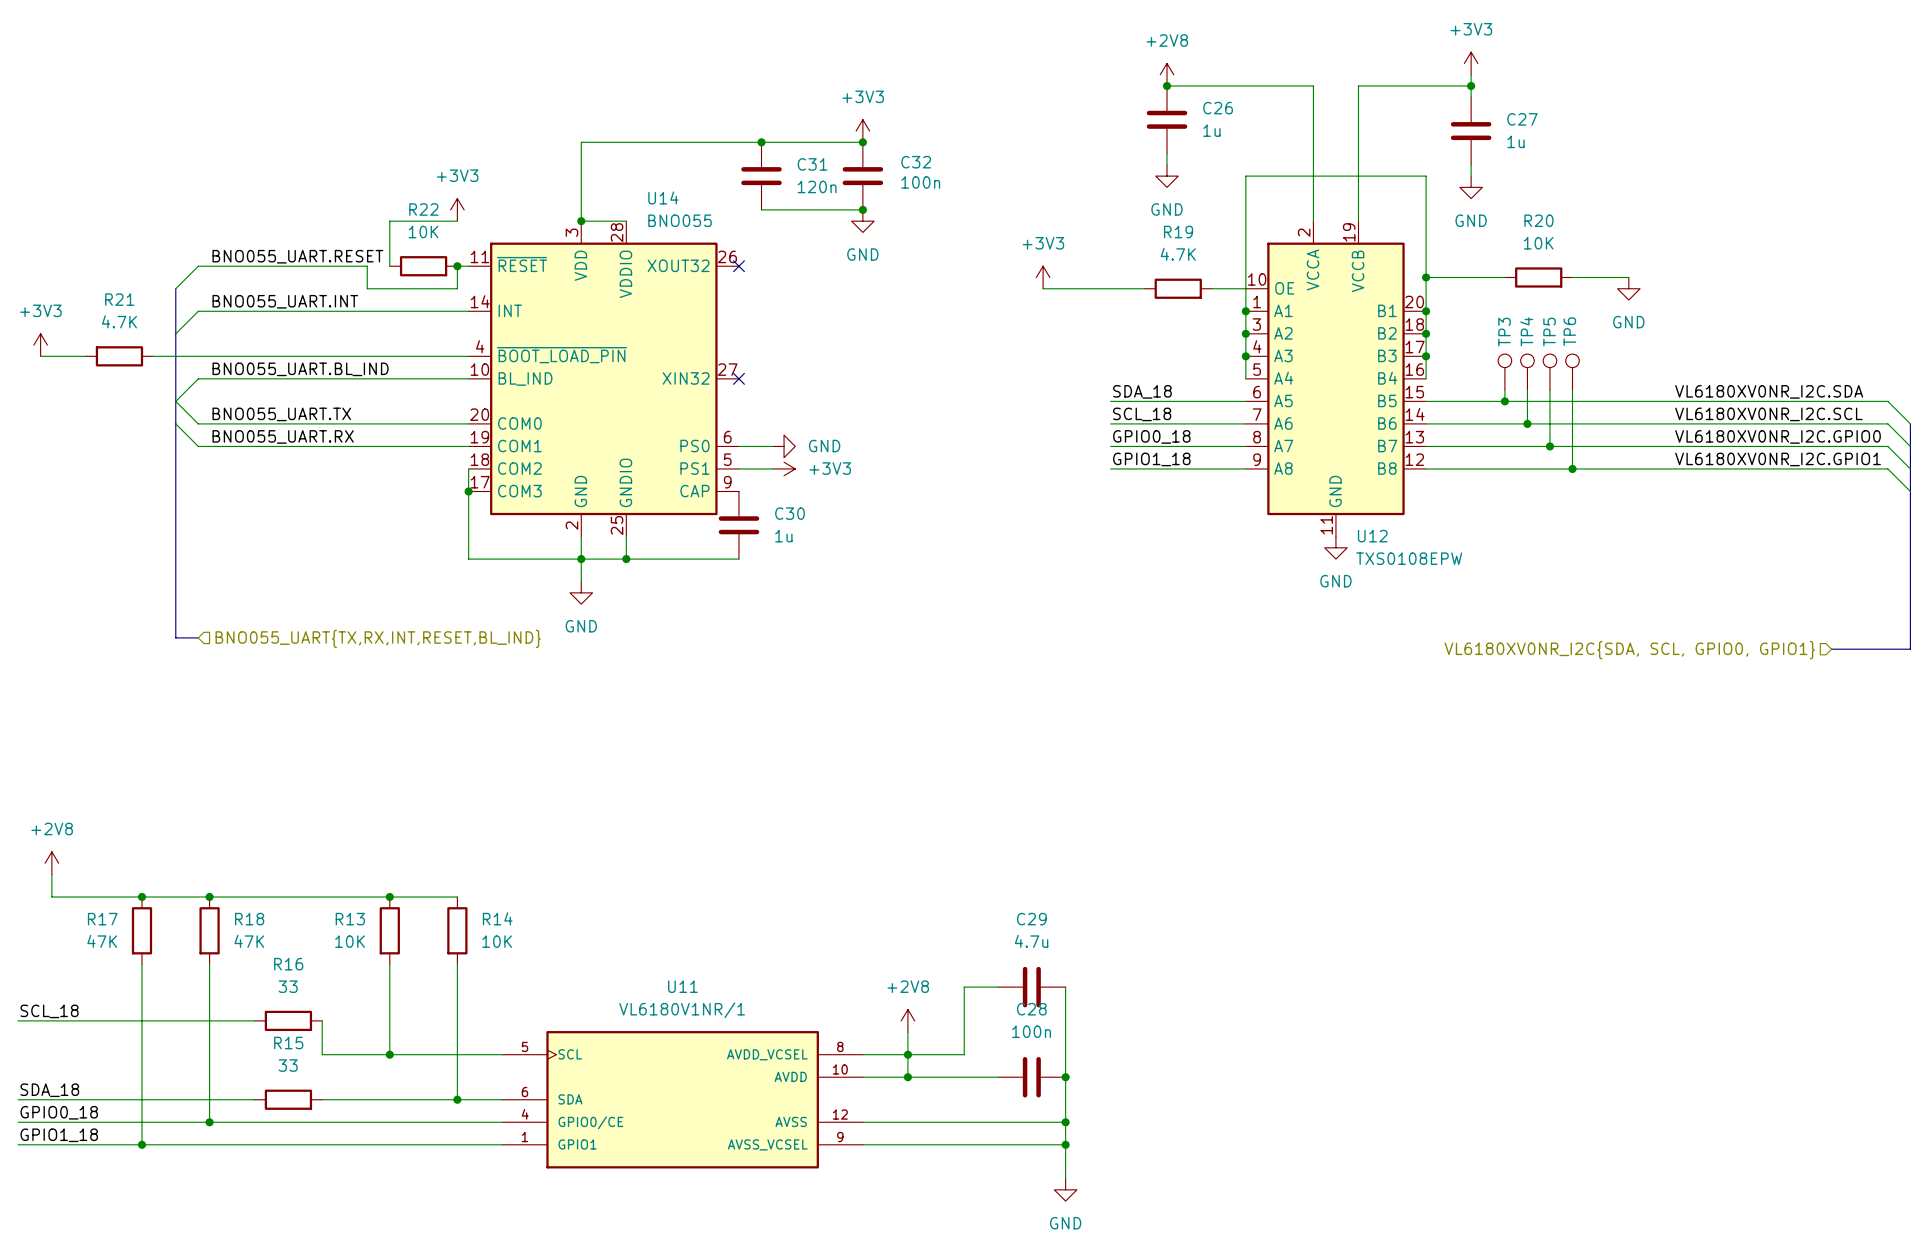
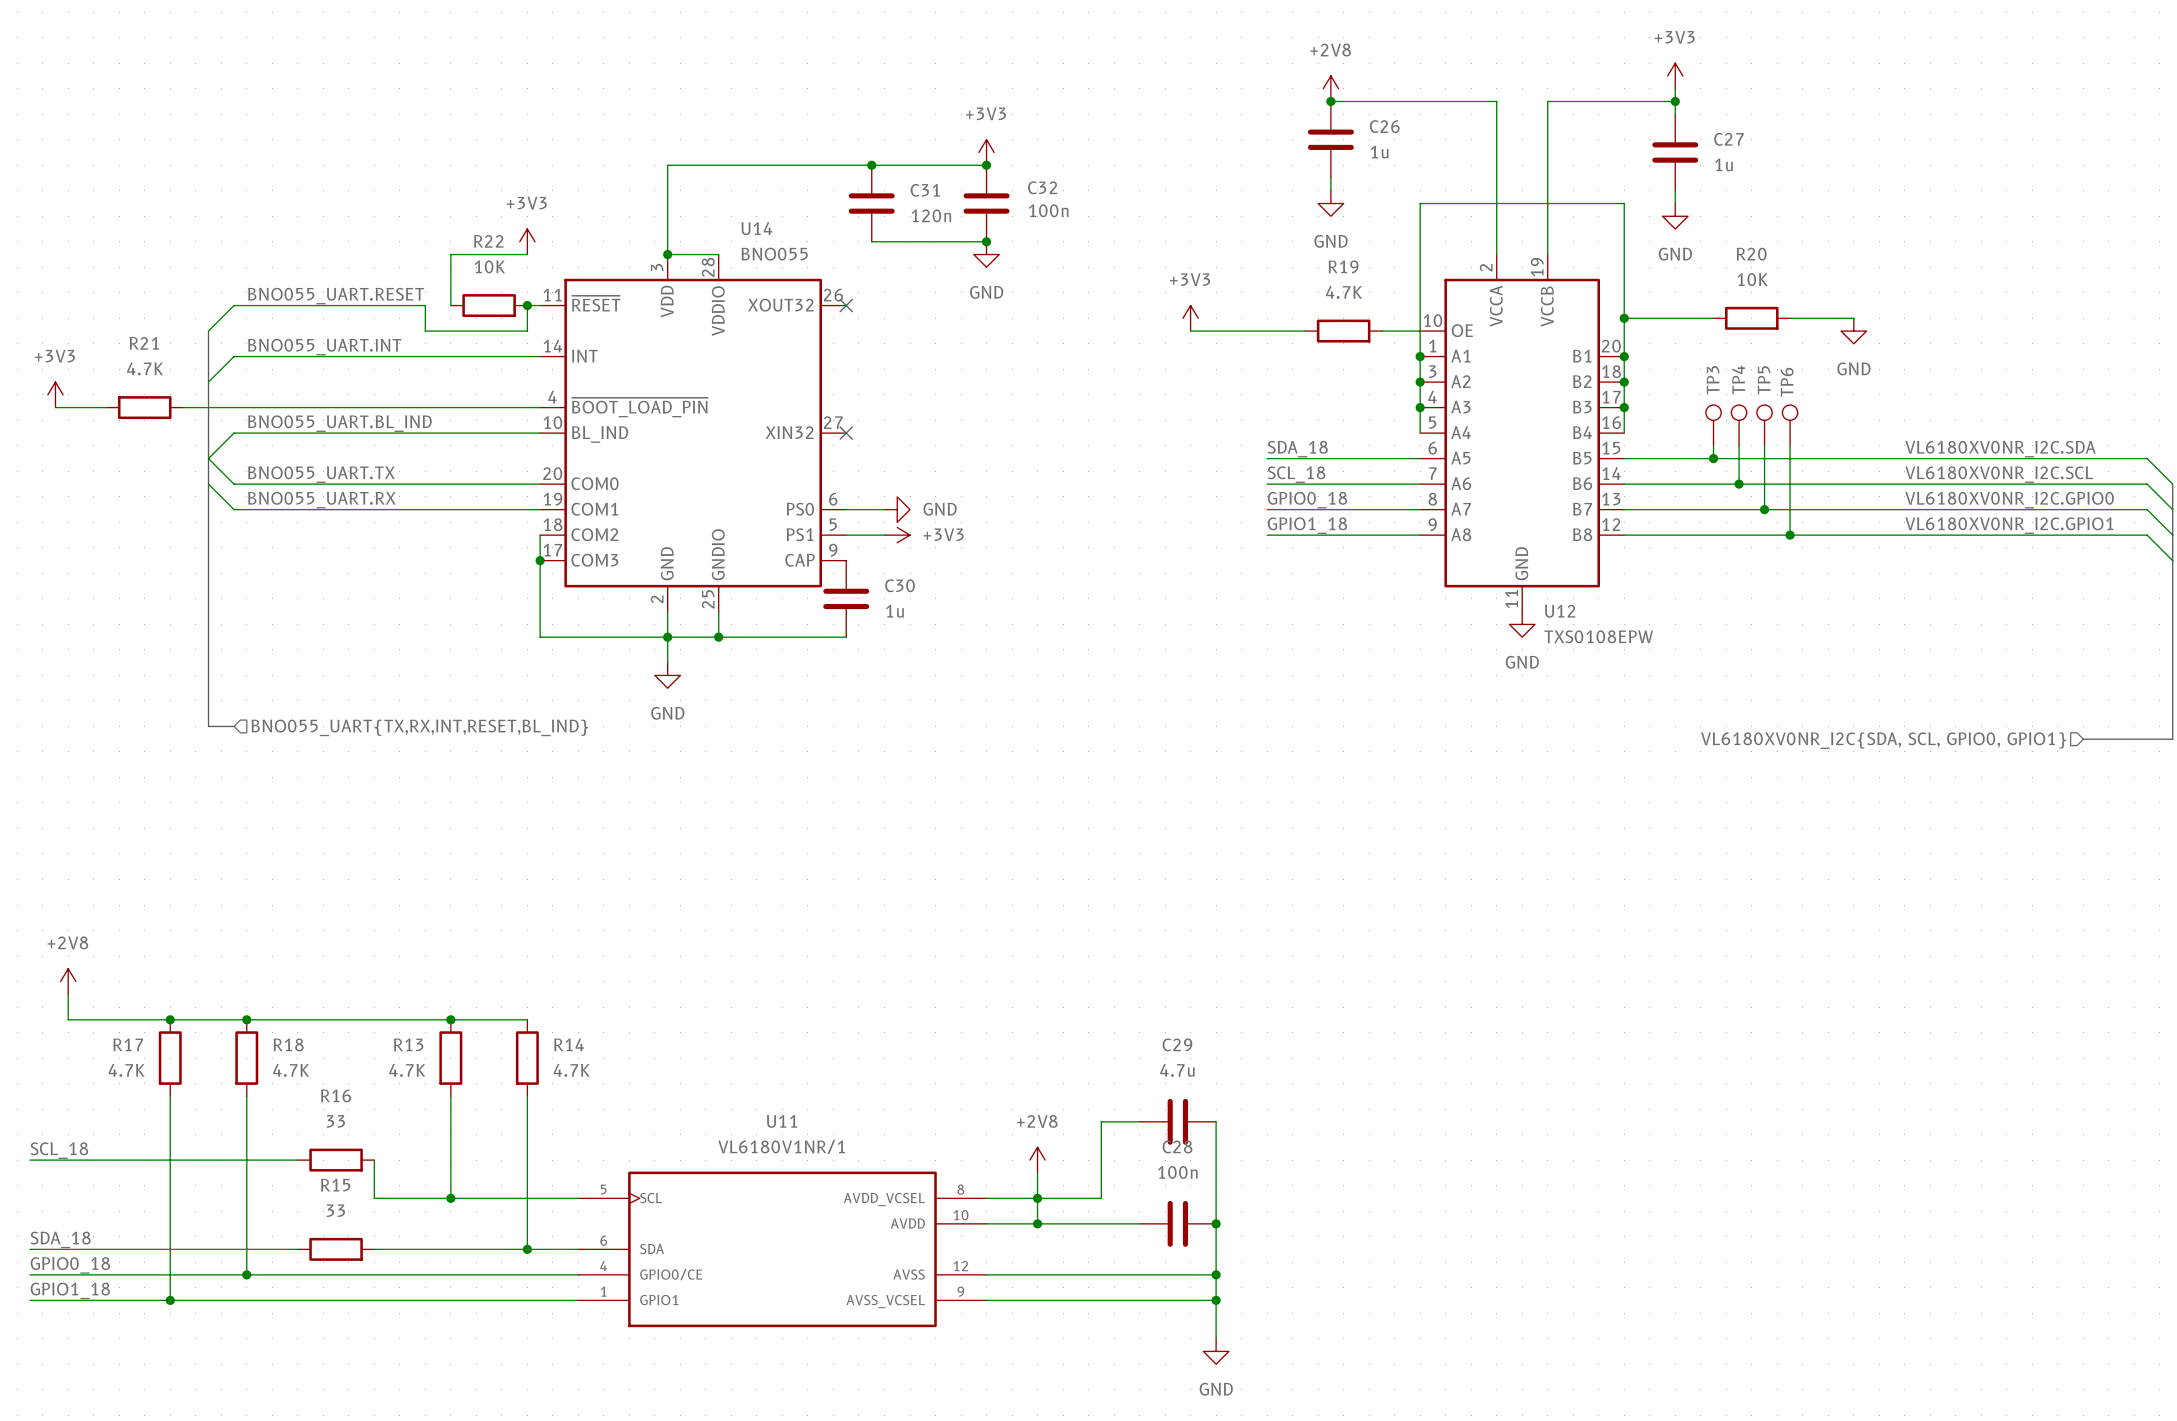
R17 value: 47K (102, 941) -> 4.7K (126, 1070)
R18 value: 47K (249, 941) -> 4.7K (291, 1070)
R13 value: 10K (350, 941) -> 4.7K (407, 1070)
R14 value: 10K (497, 941) -> 4.7K (571, 1070)

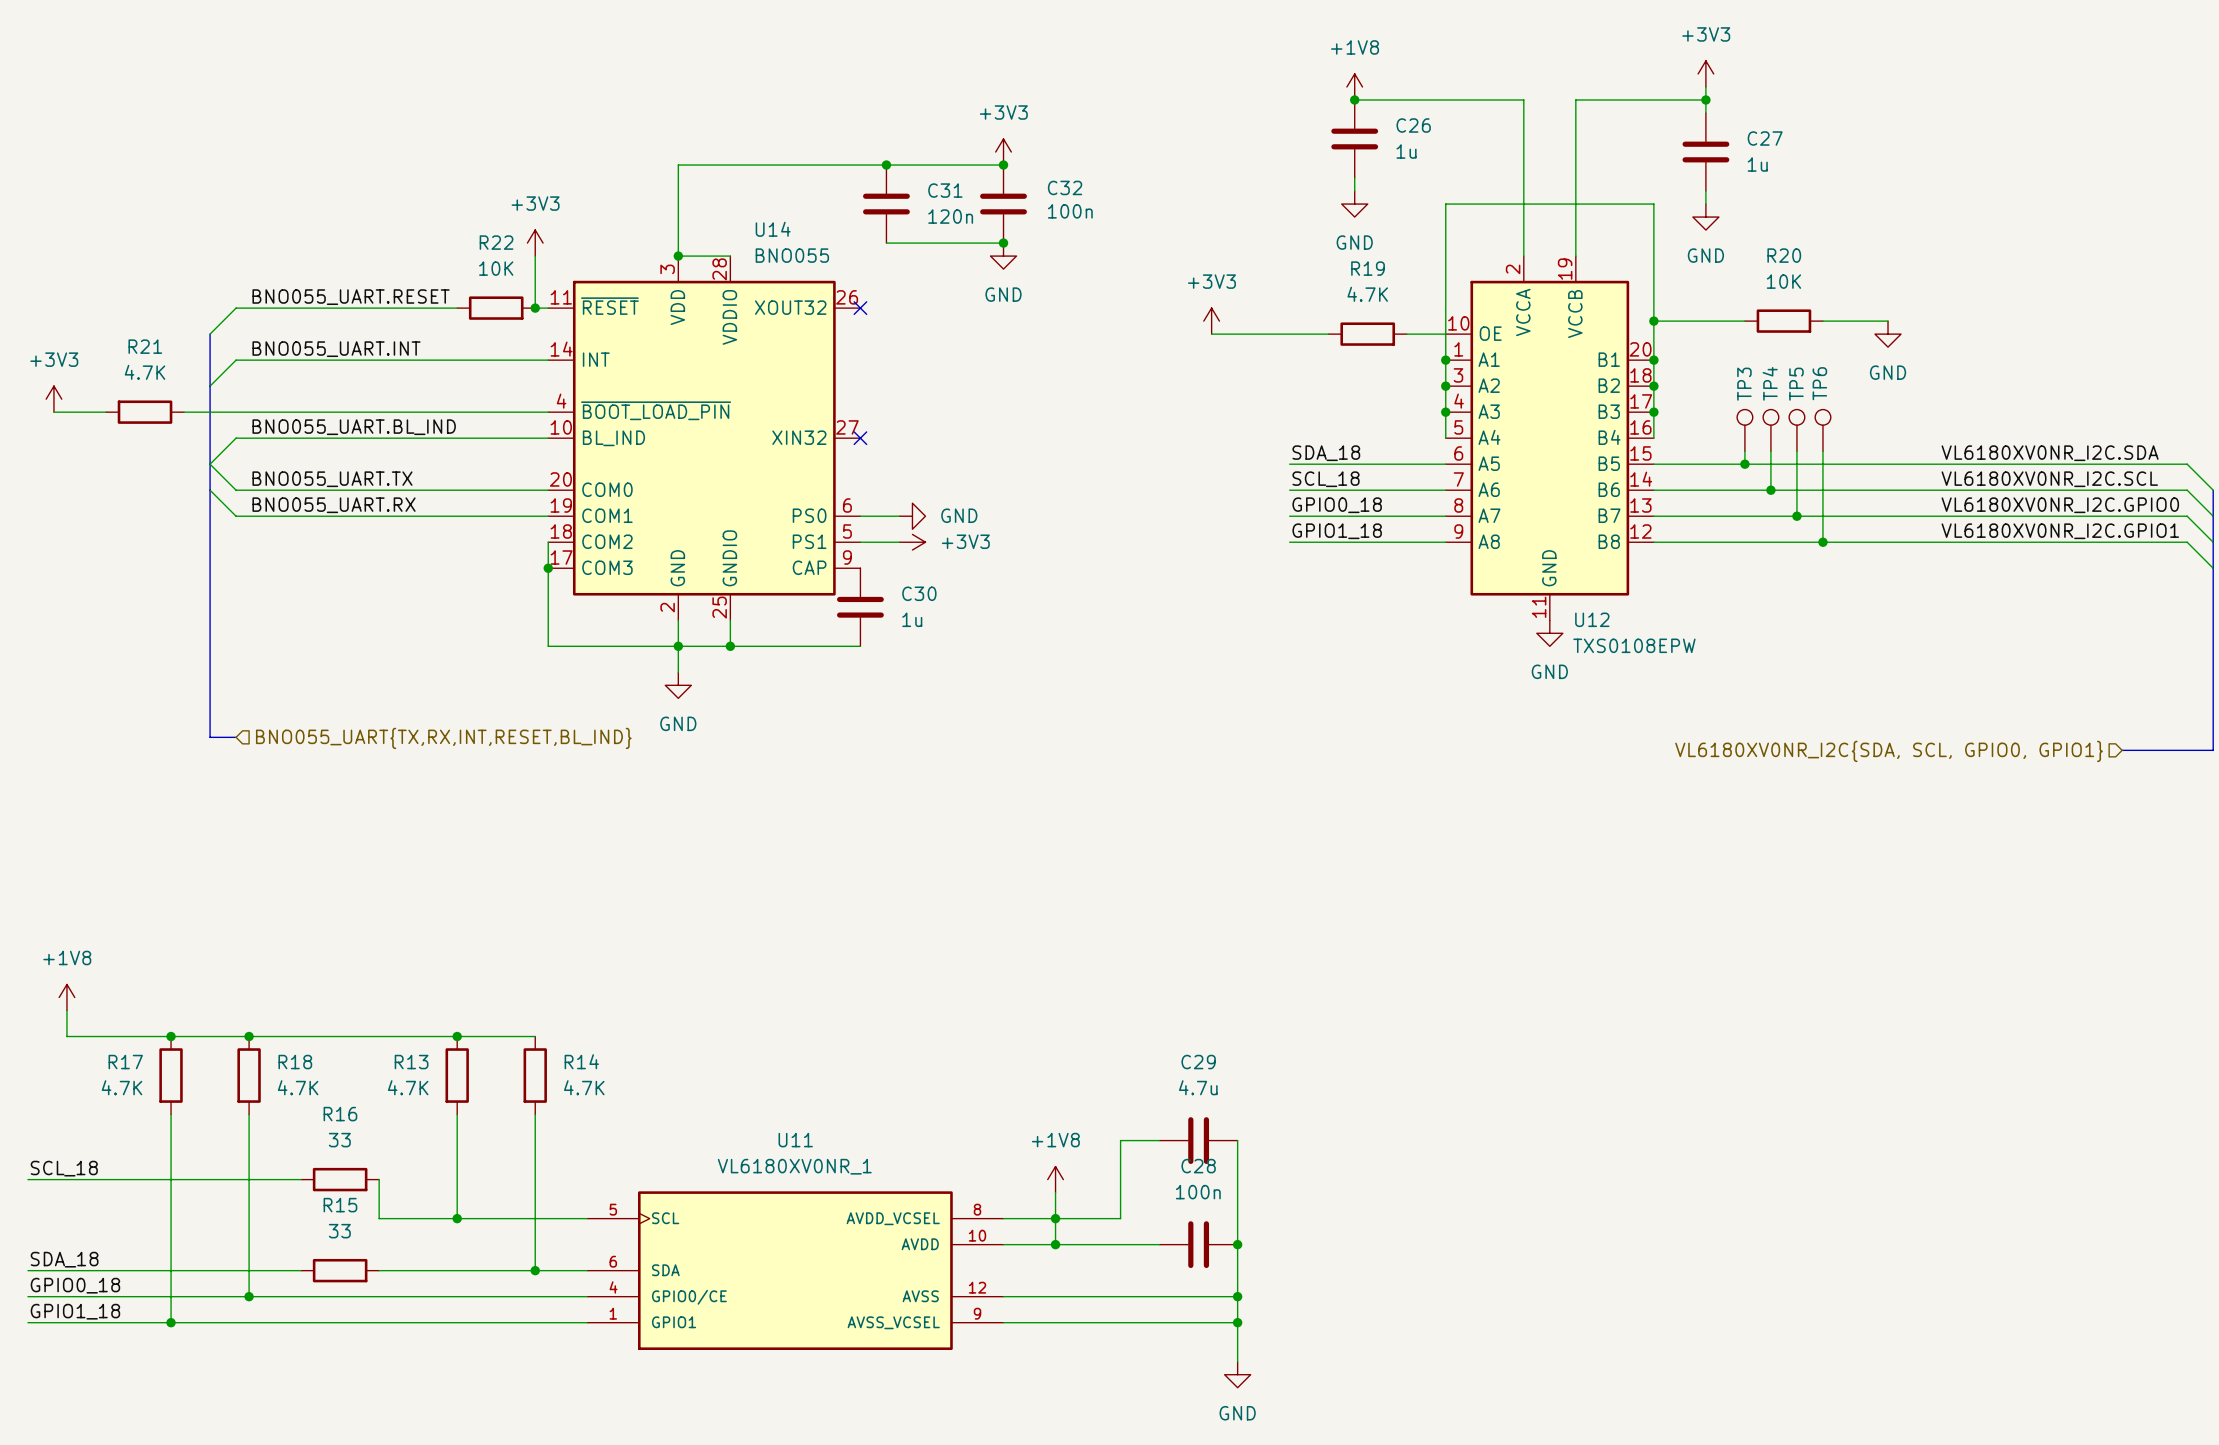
power symbol: +2V8 (1330, 88) -> +1V8 (1354, 86)
wire: (527, 254) (450, 254) (450, 305) -> (535, 256) (535, 308)
wire: (425, 305) (425, 331) (527, 331) (527, 305) -> (431, 308) (457, 308)
power symbol: +2V8 (68, 981) -> +1V8 (66, 997)
U11 value: VL6180V1NR/1 (781, 1146) -> VL6180XV0NR_1 (794, 1166)
power symbol: +2V8 (1037, 1160) -> +1V8 (1055, 1179)

